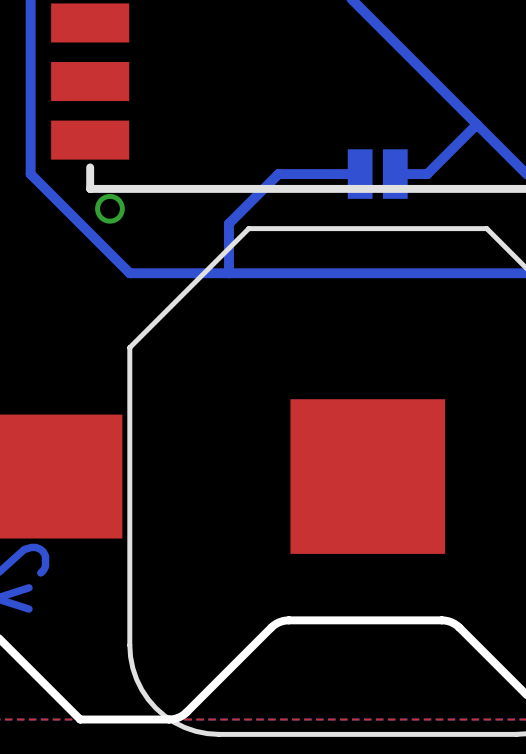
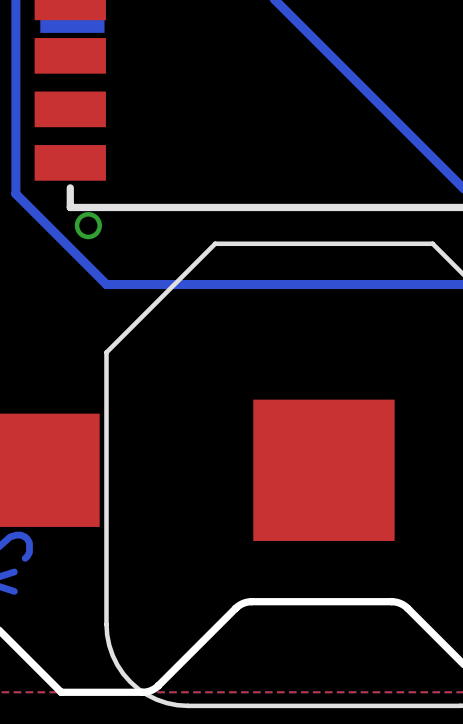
bottom track: (476, 124) (427, 174) (395, 174) -> none
bottom track: (360, 174) (278, 174) (228, 223) (228, 273) -> none
part: (377, 174) -> none

